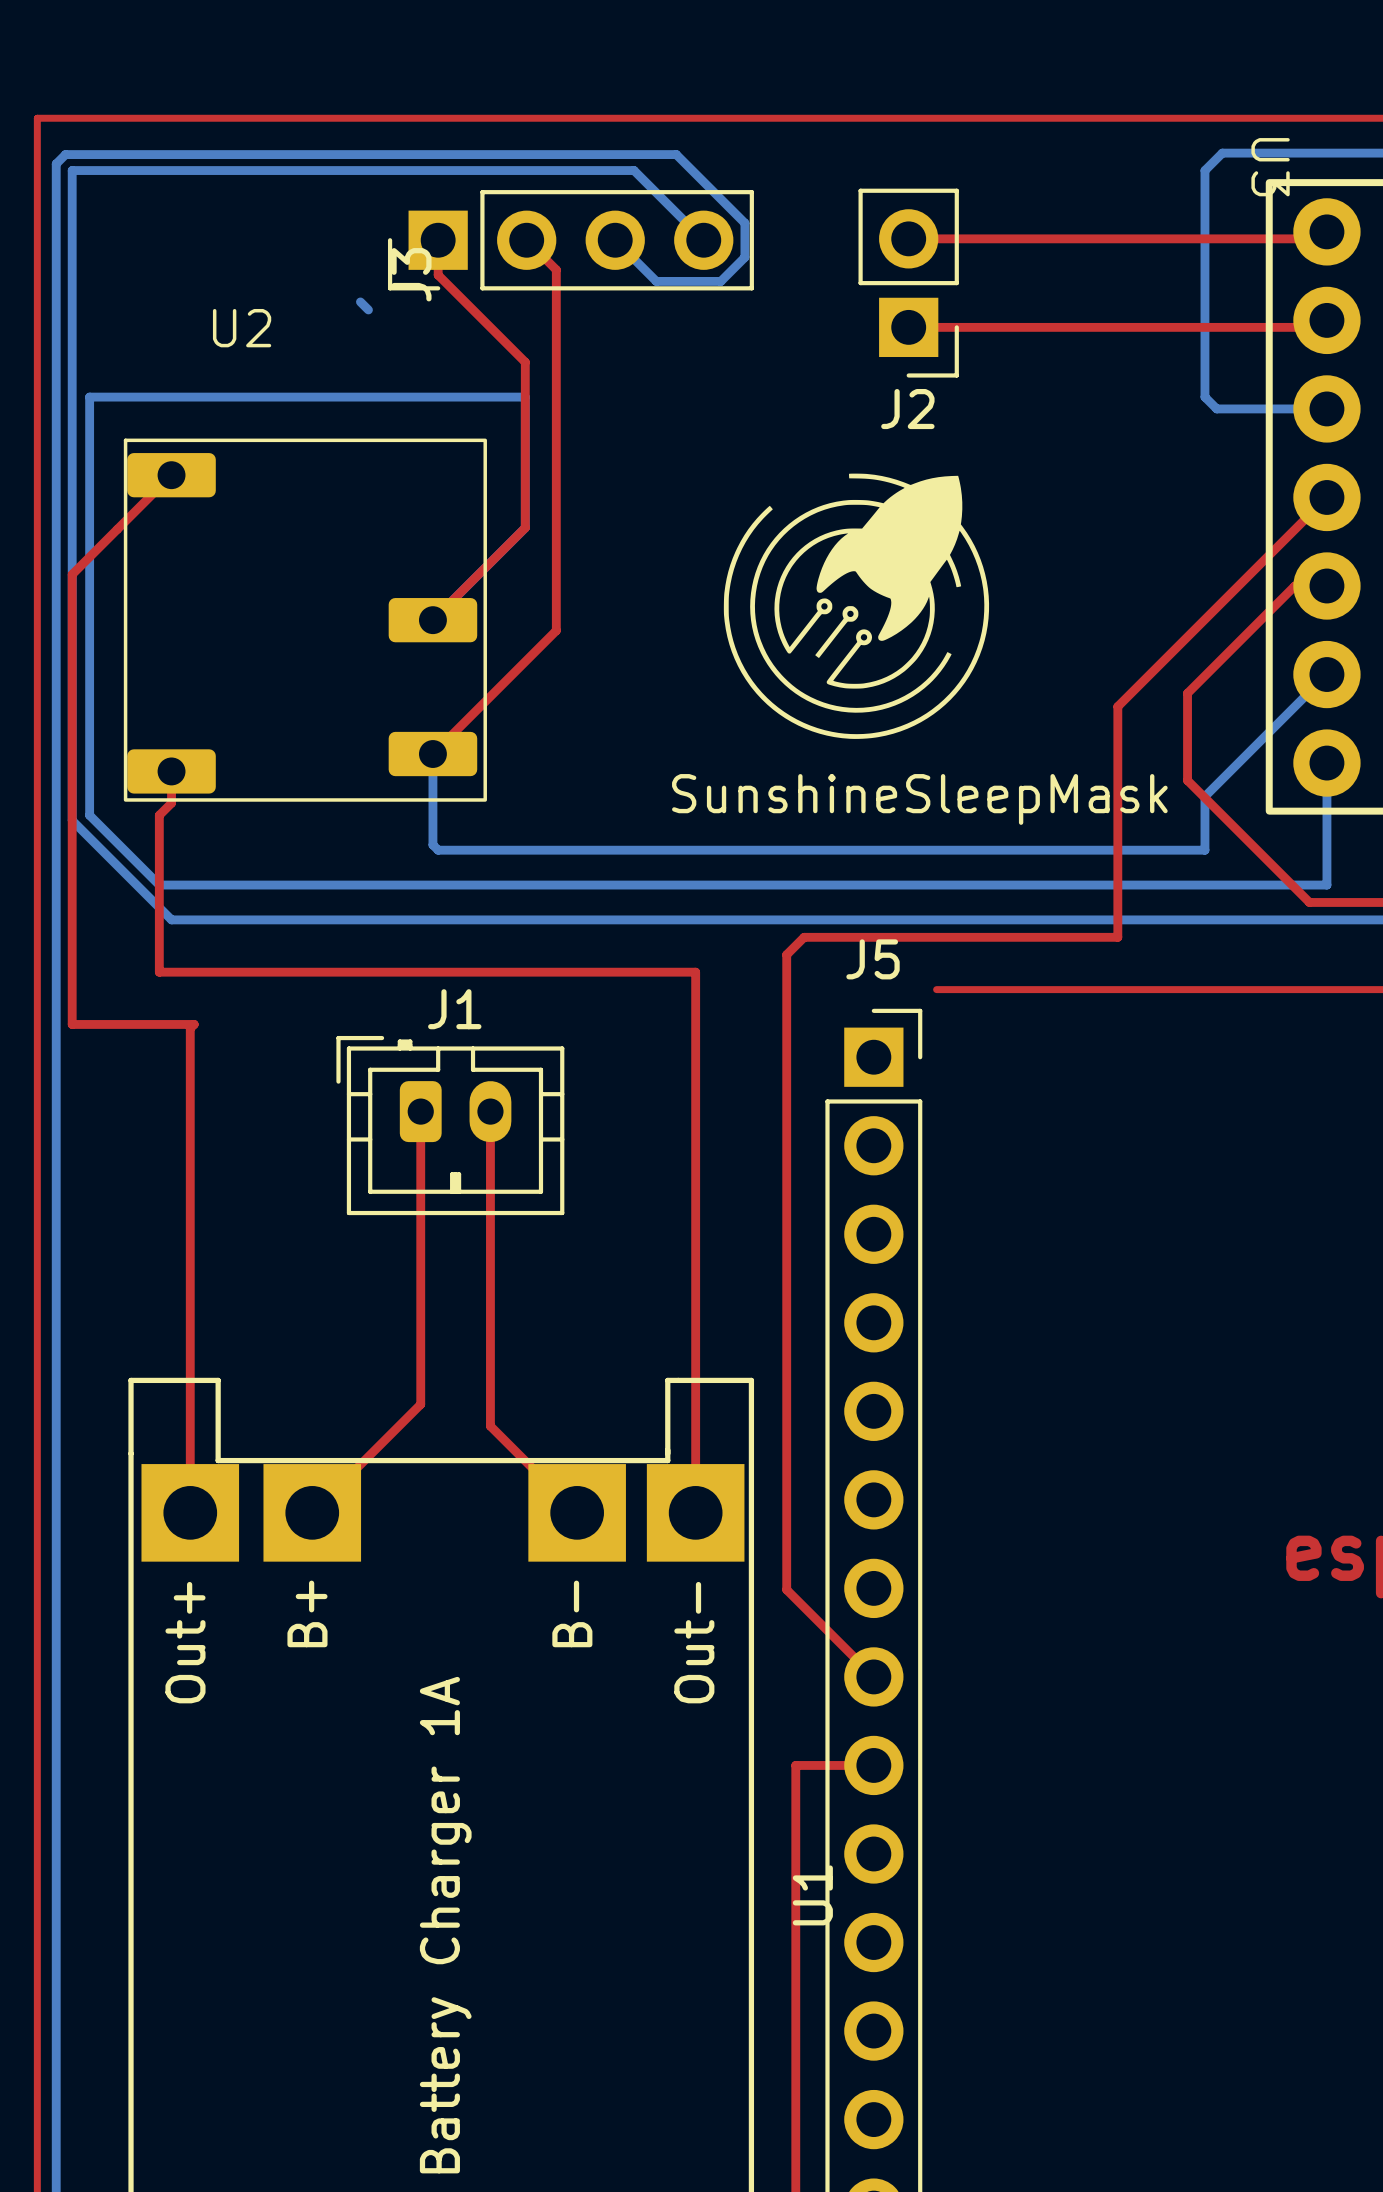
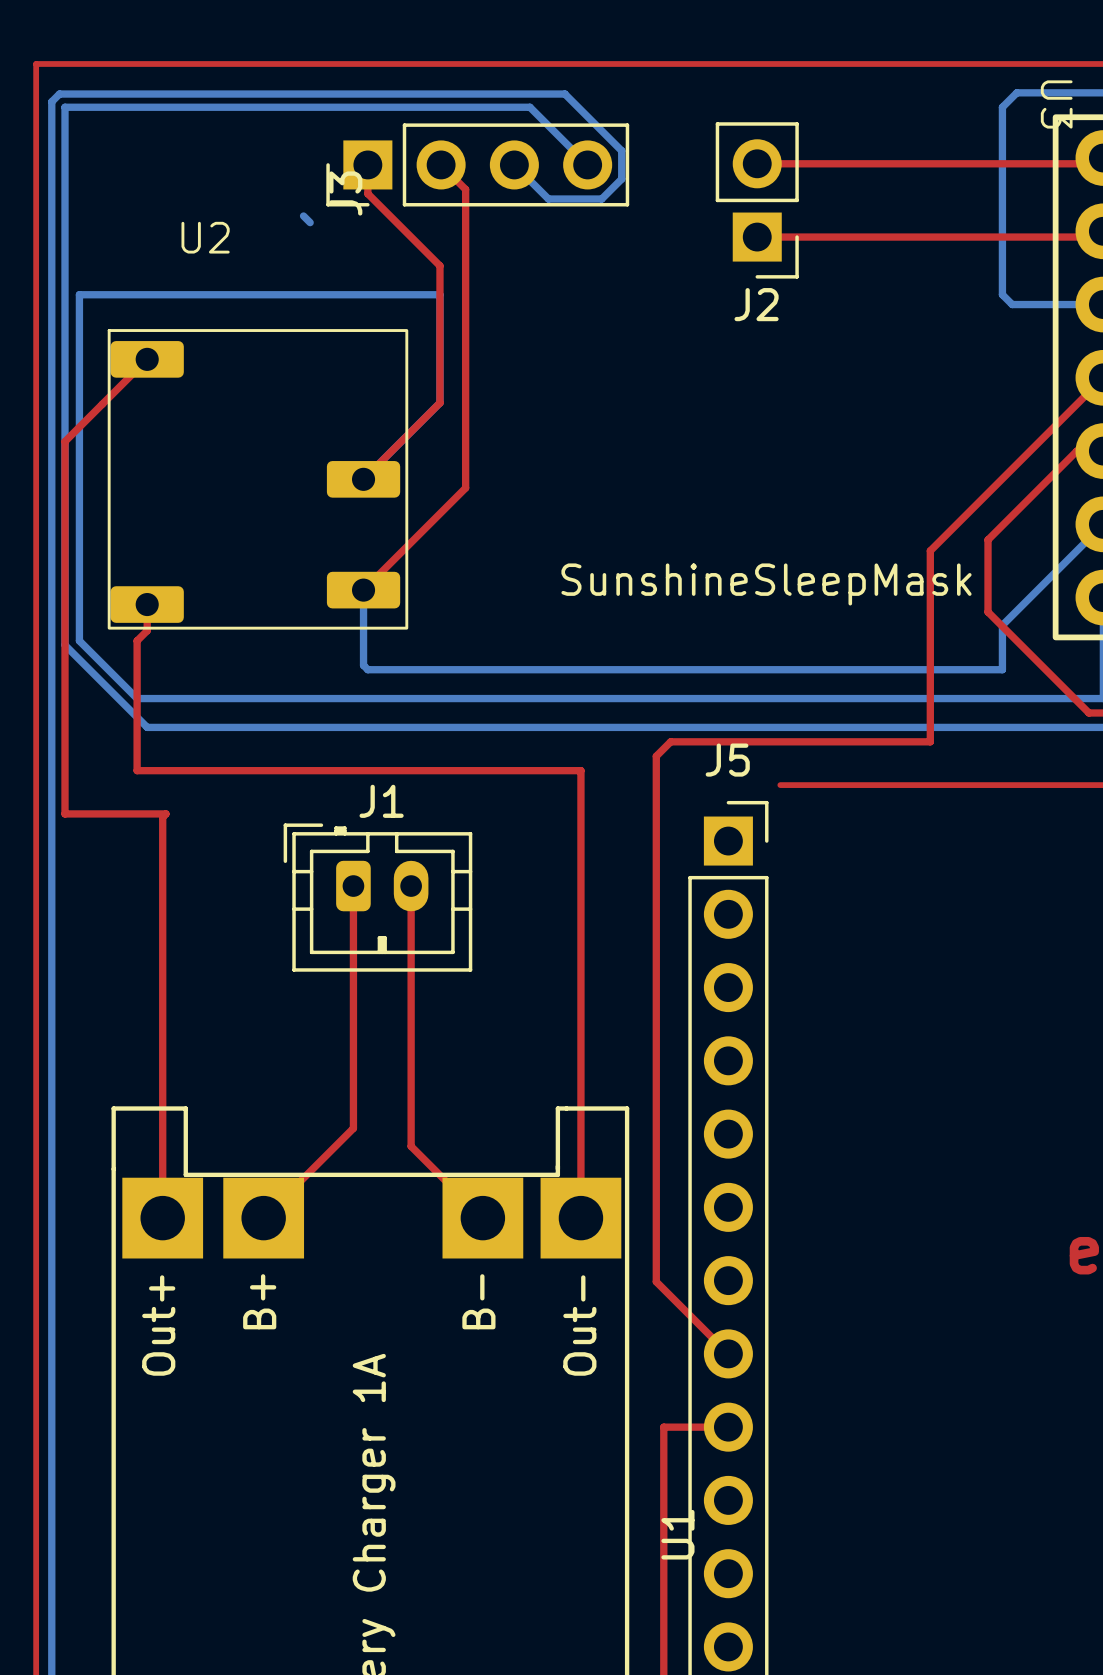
drawing: [723, 473, 990, 739] -> none
text position: SunshineSleepMask (919, 799) -> SunshineSleepMask (766, 584)

